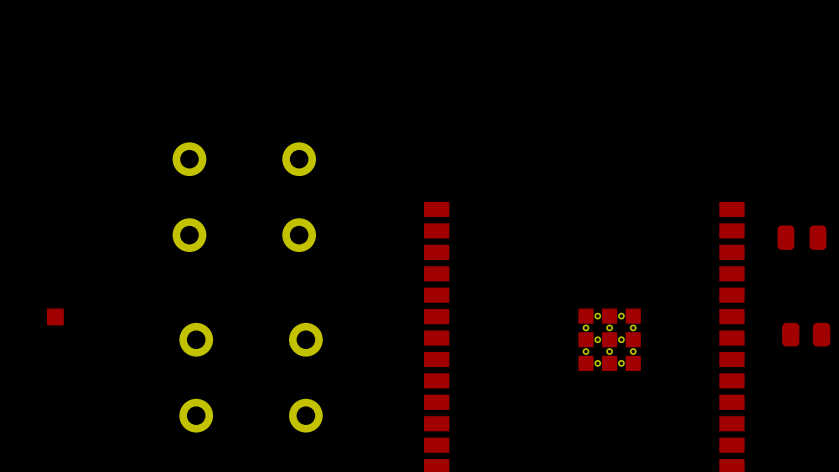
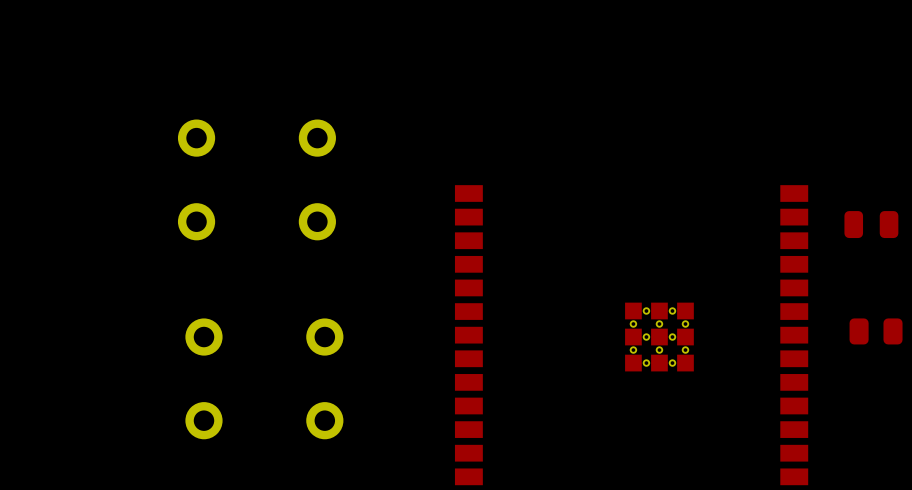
part: (55, 316) -> none

